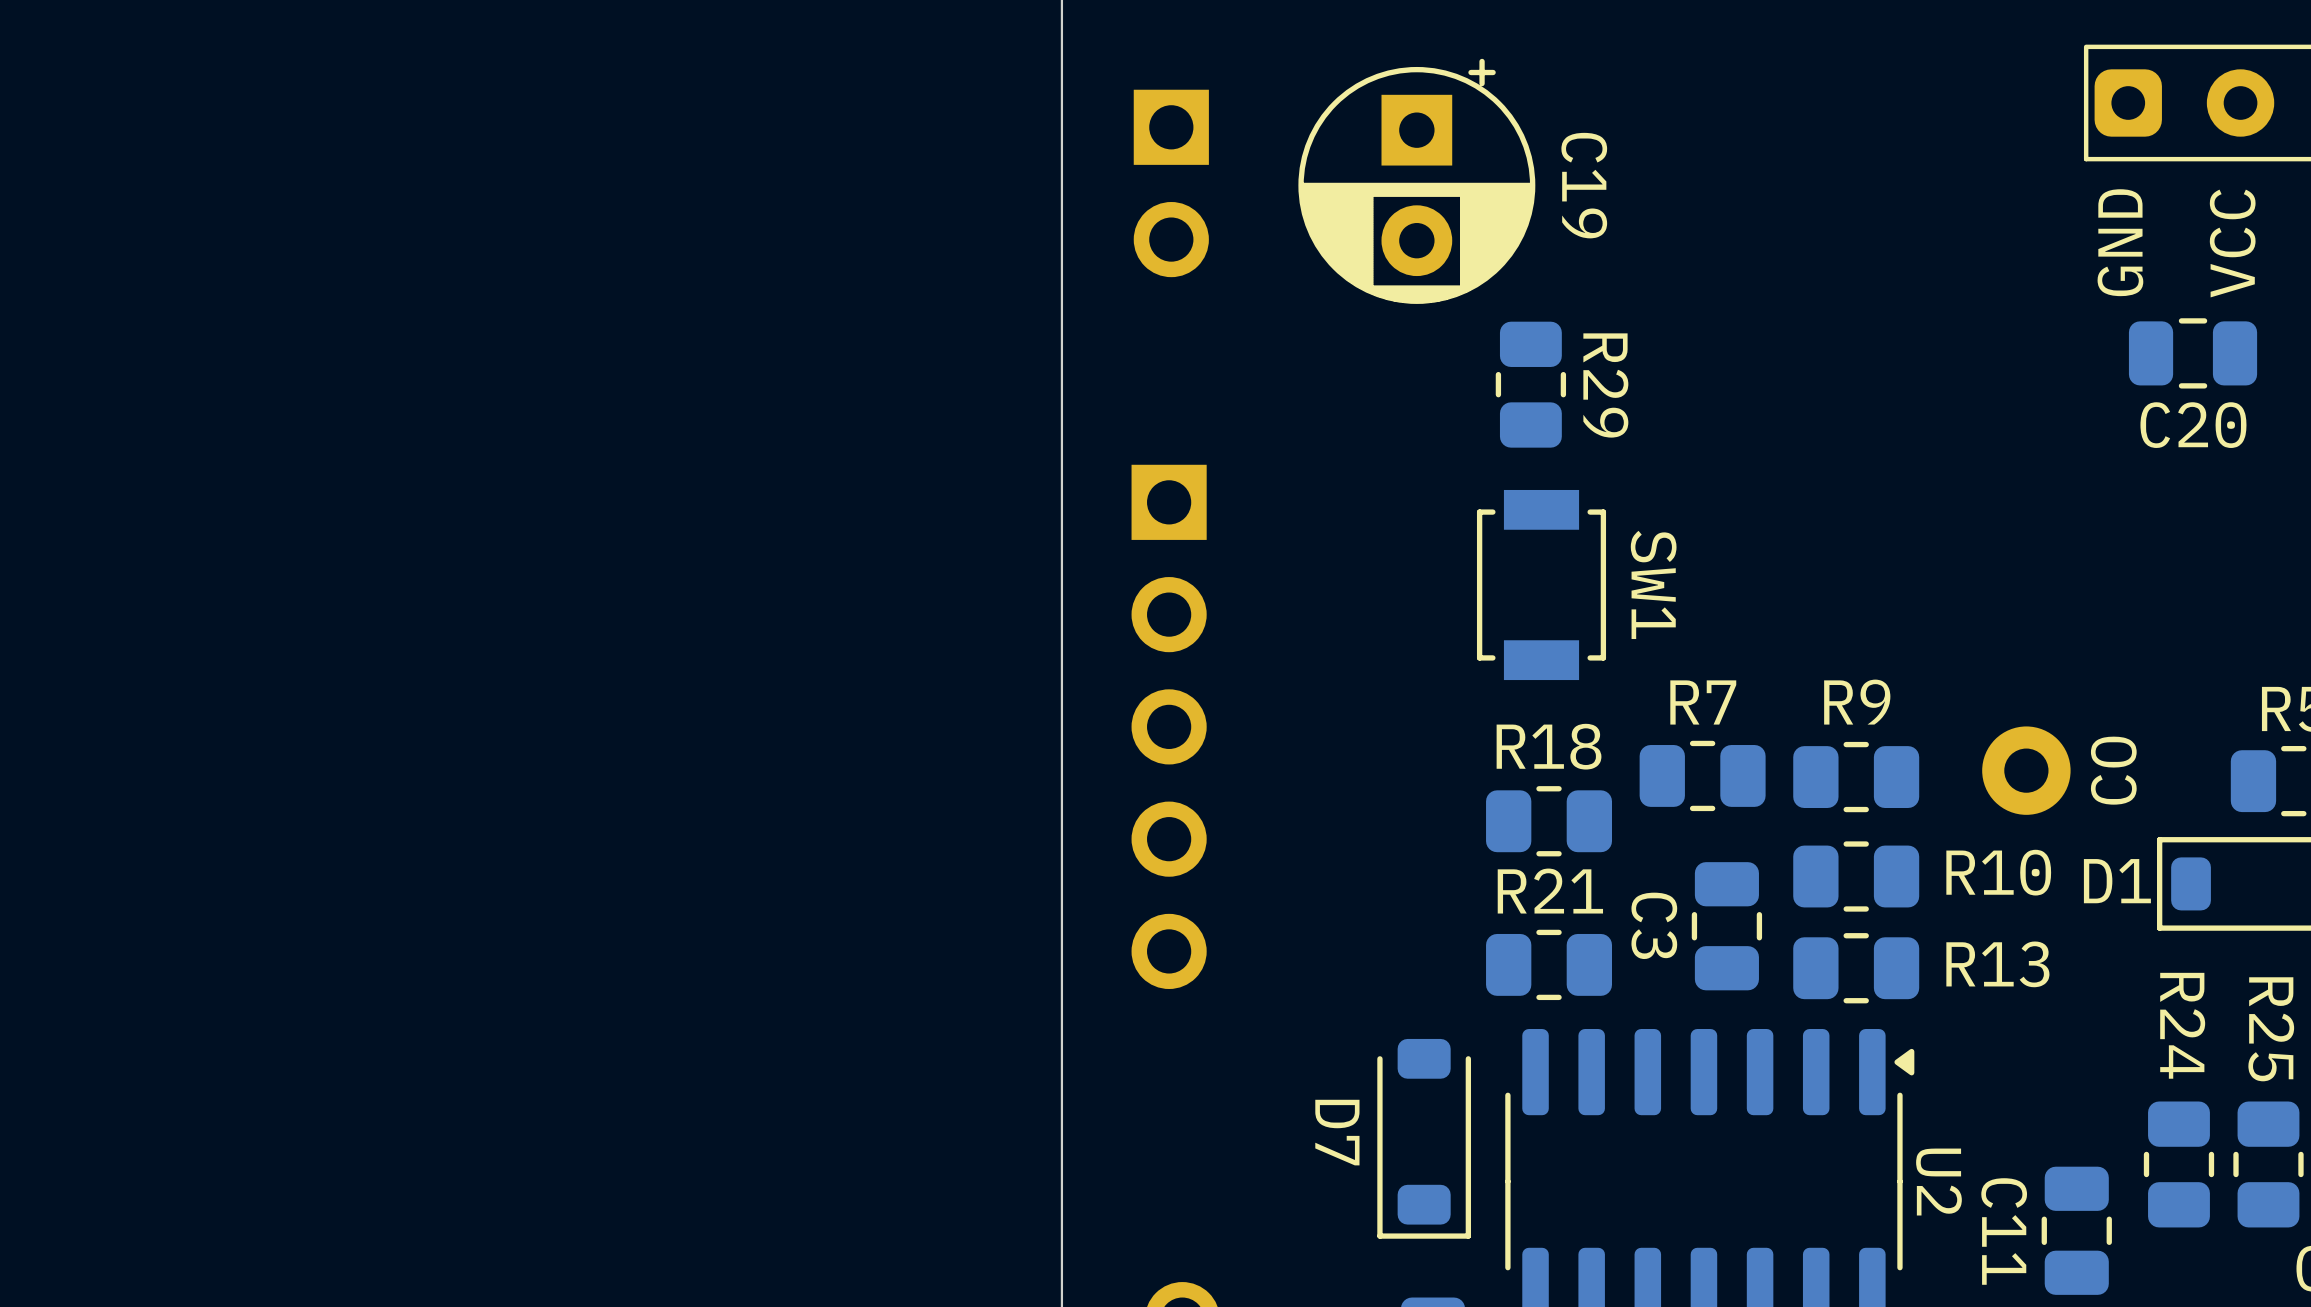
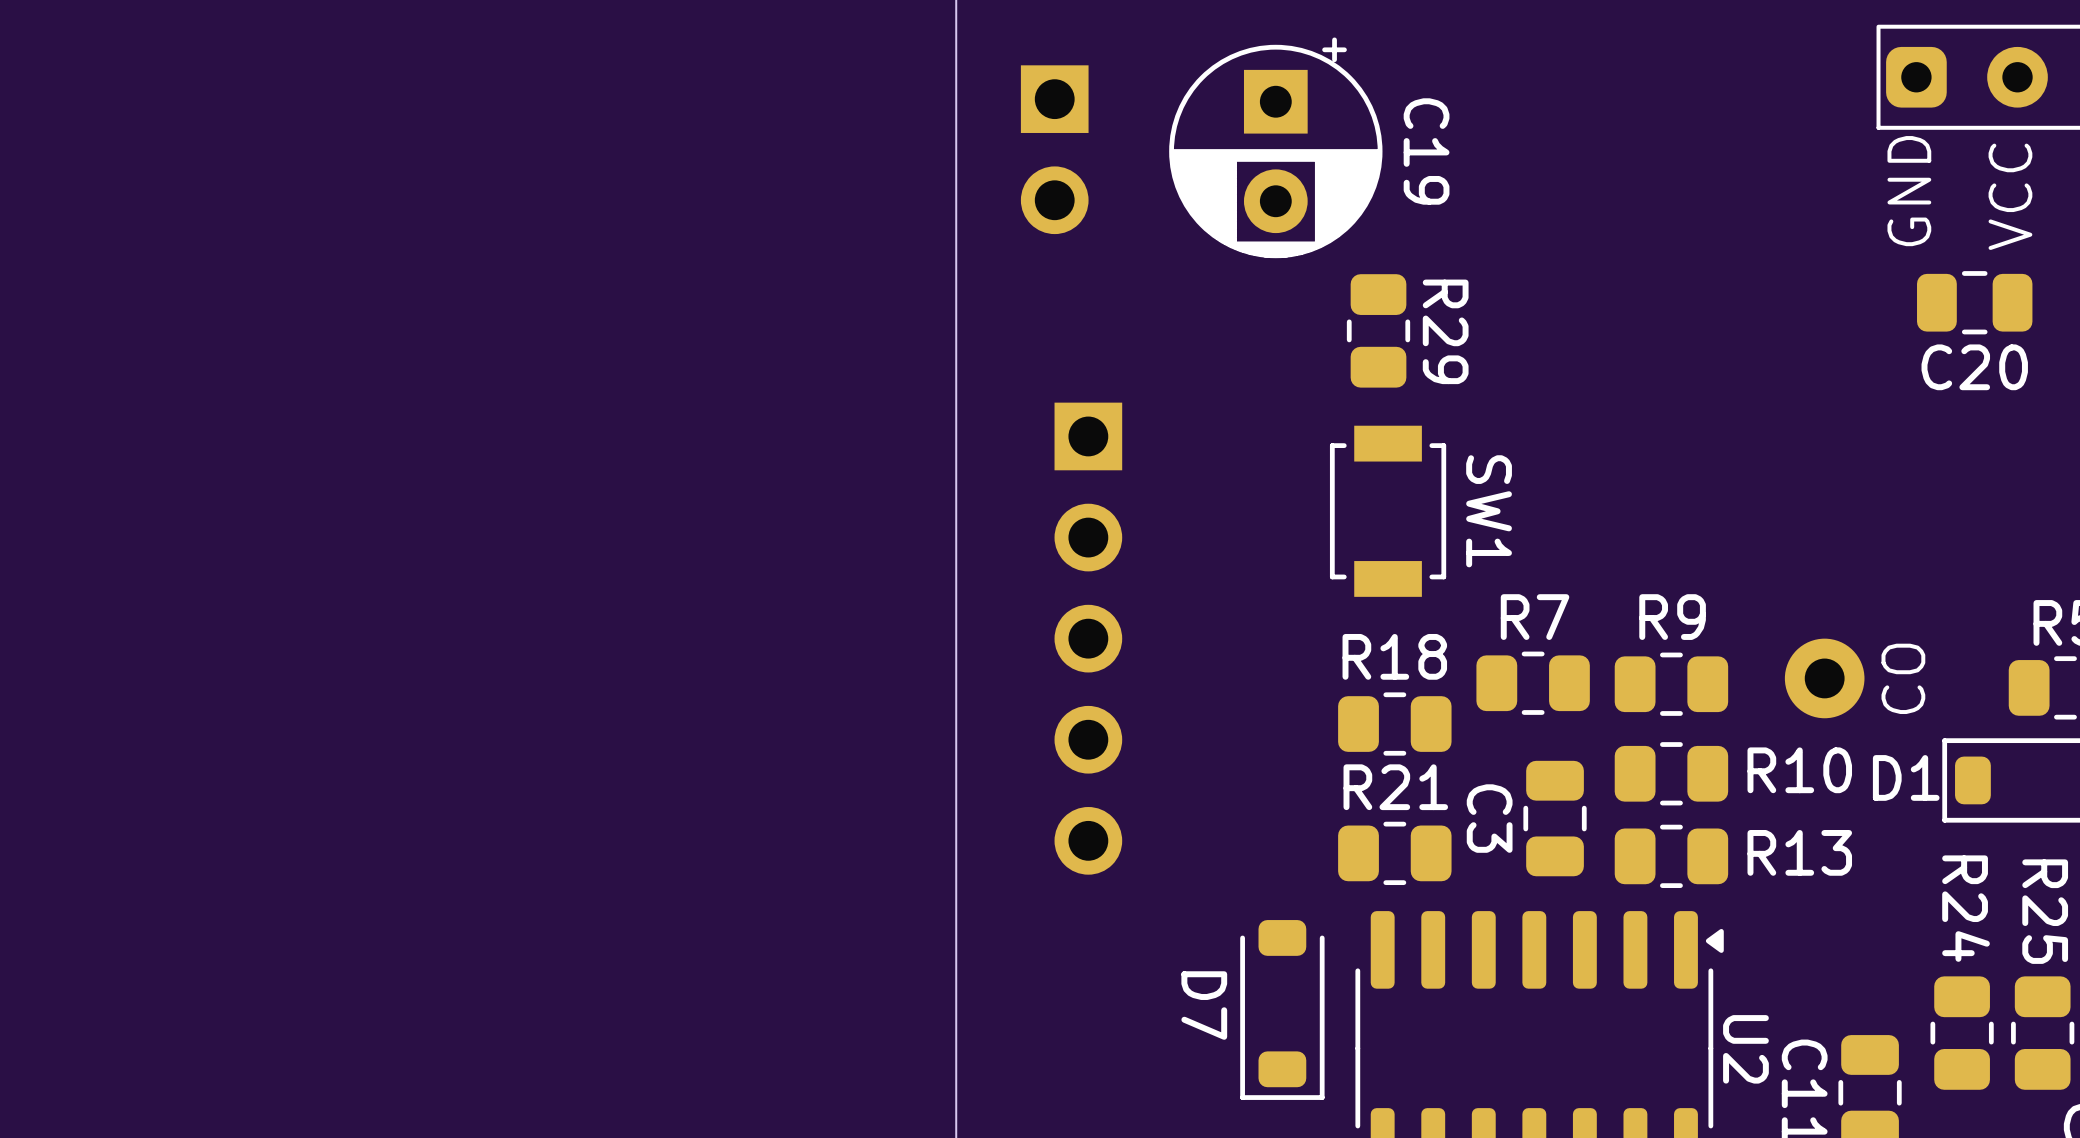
part position: (1169, 726) -> (1088, 638)

